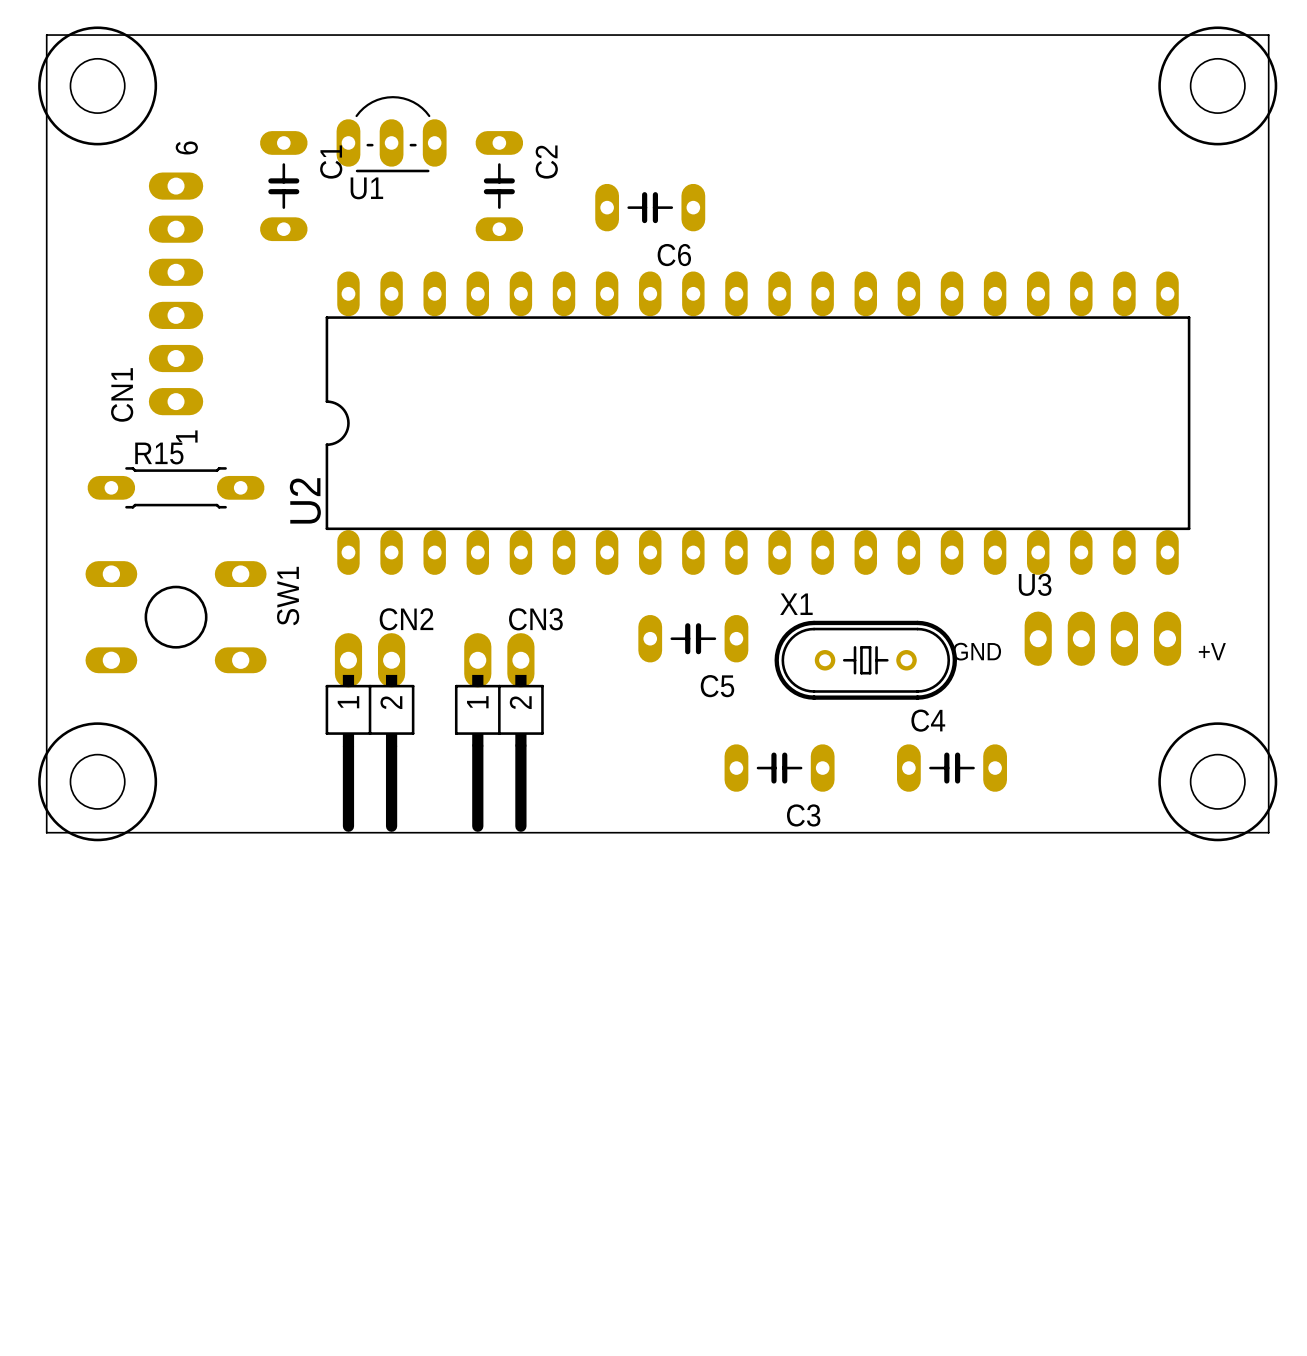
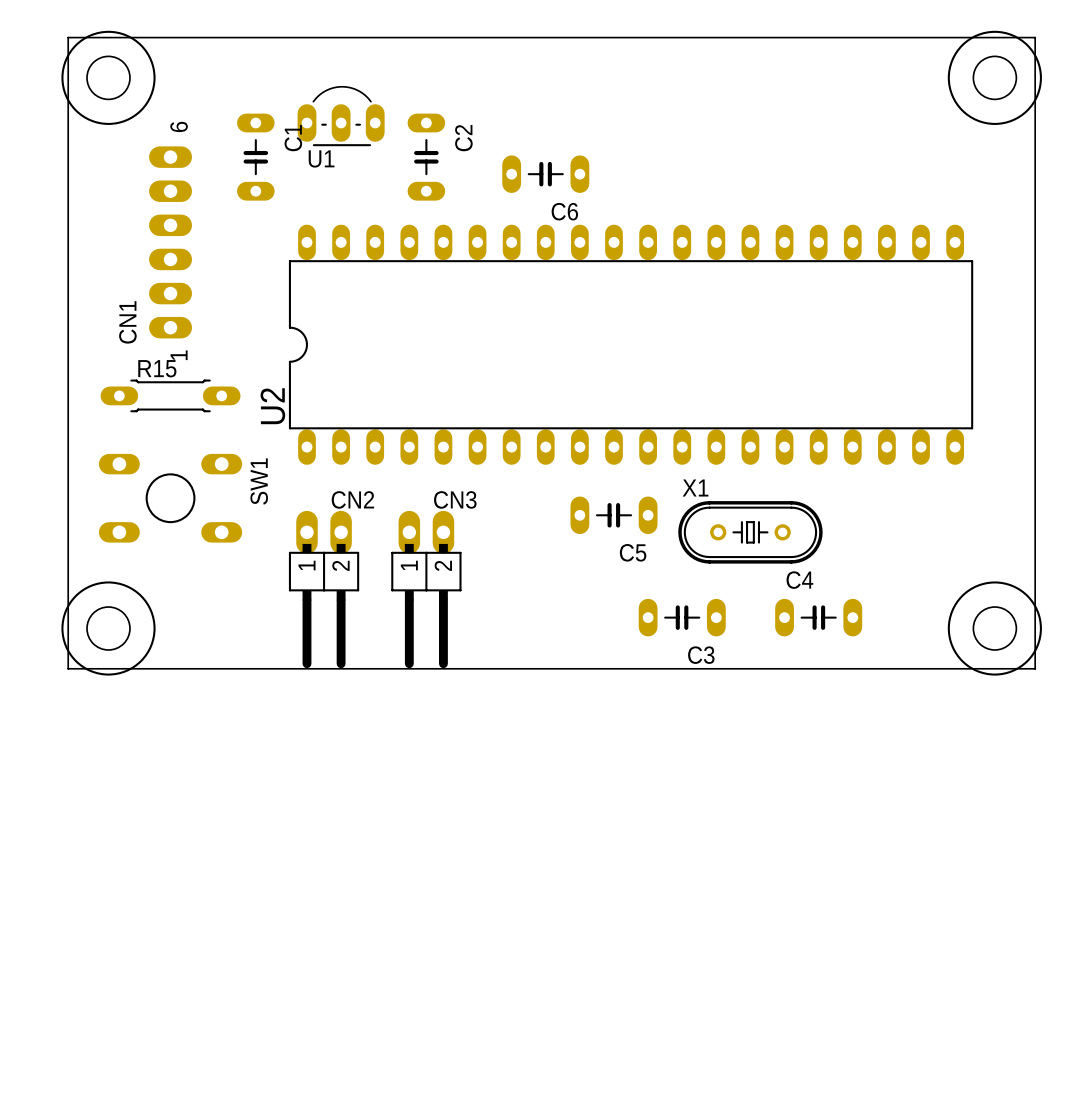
C5 position: (693, 638) -> (614, 515)
U3: (1102, 638) -> none
X1 position: (865, 660) -> (750, 532)
C3 position: (779, 768) -> (682, 617)
C4 position: (951, 768) -> (818, 617)

